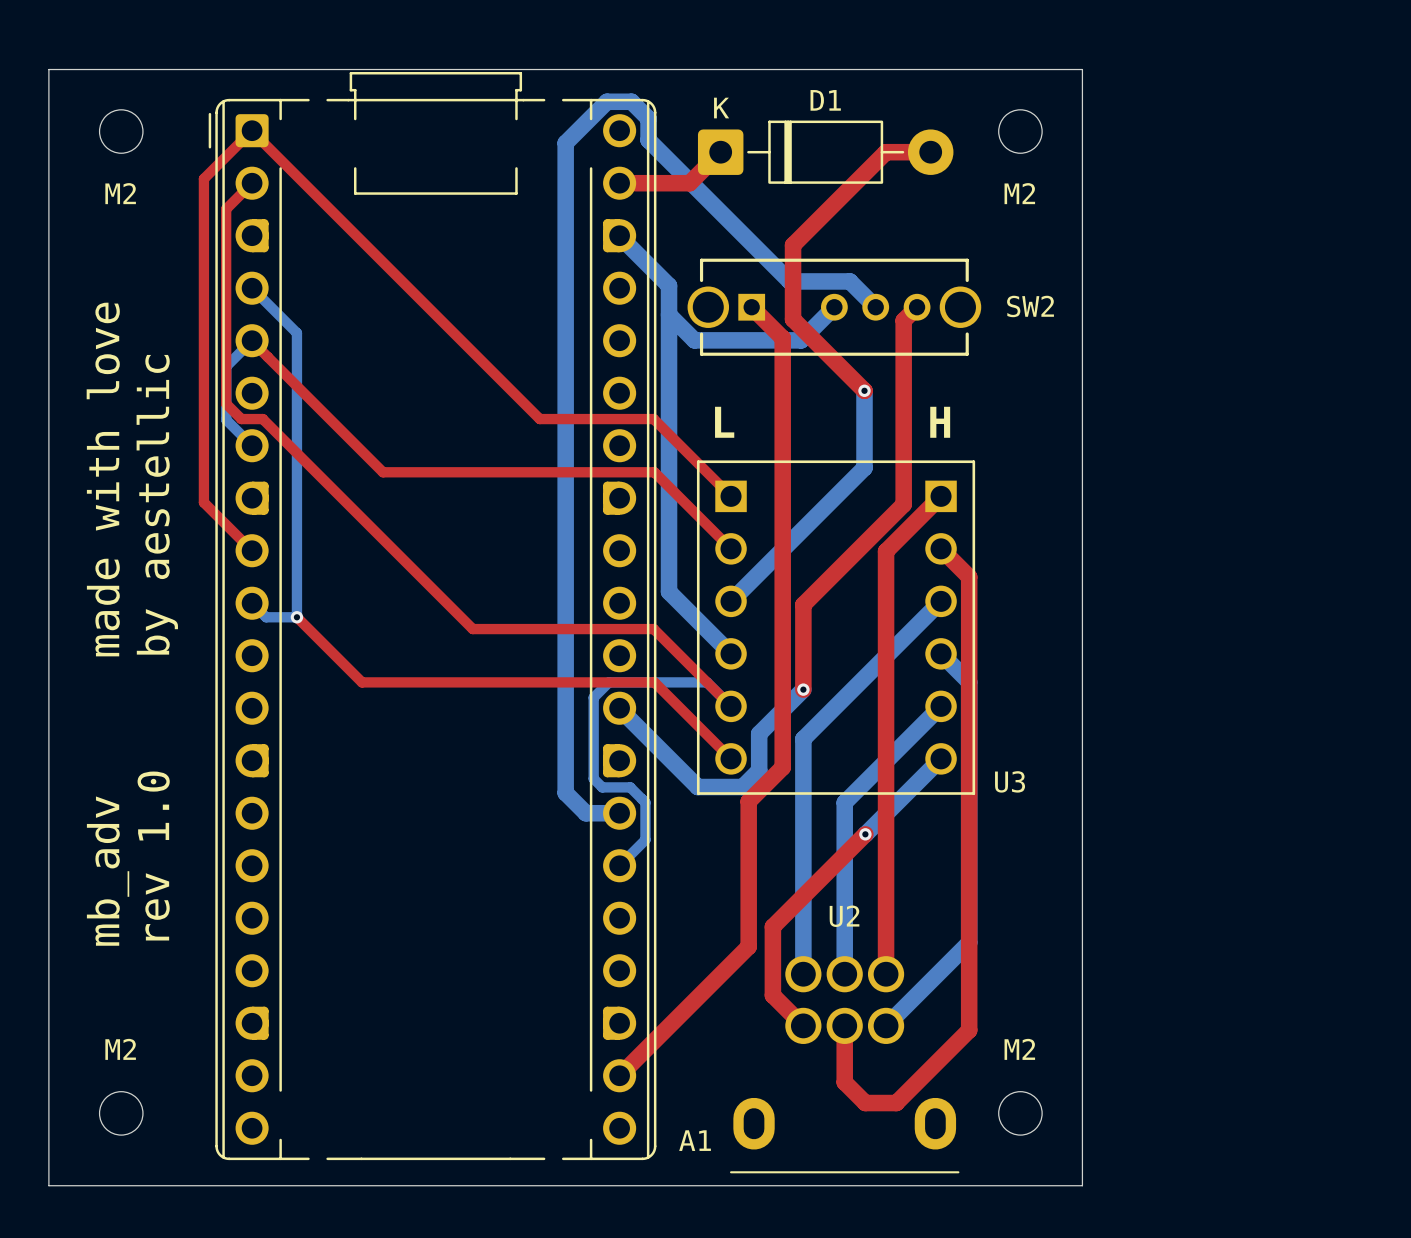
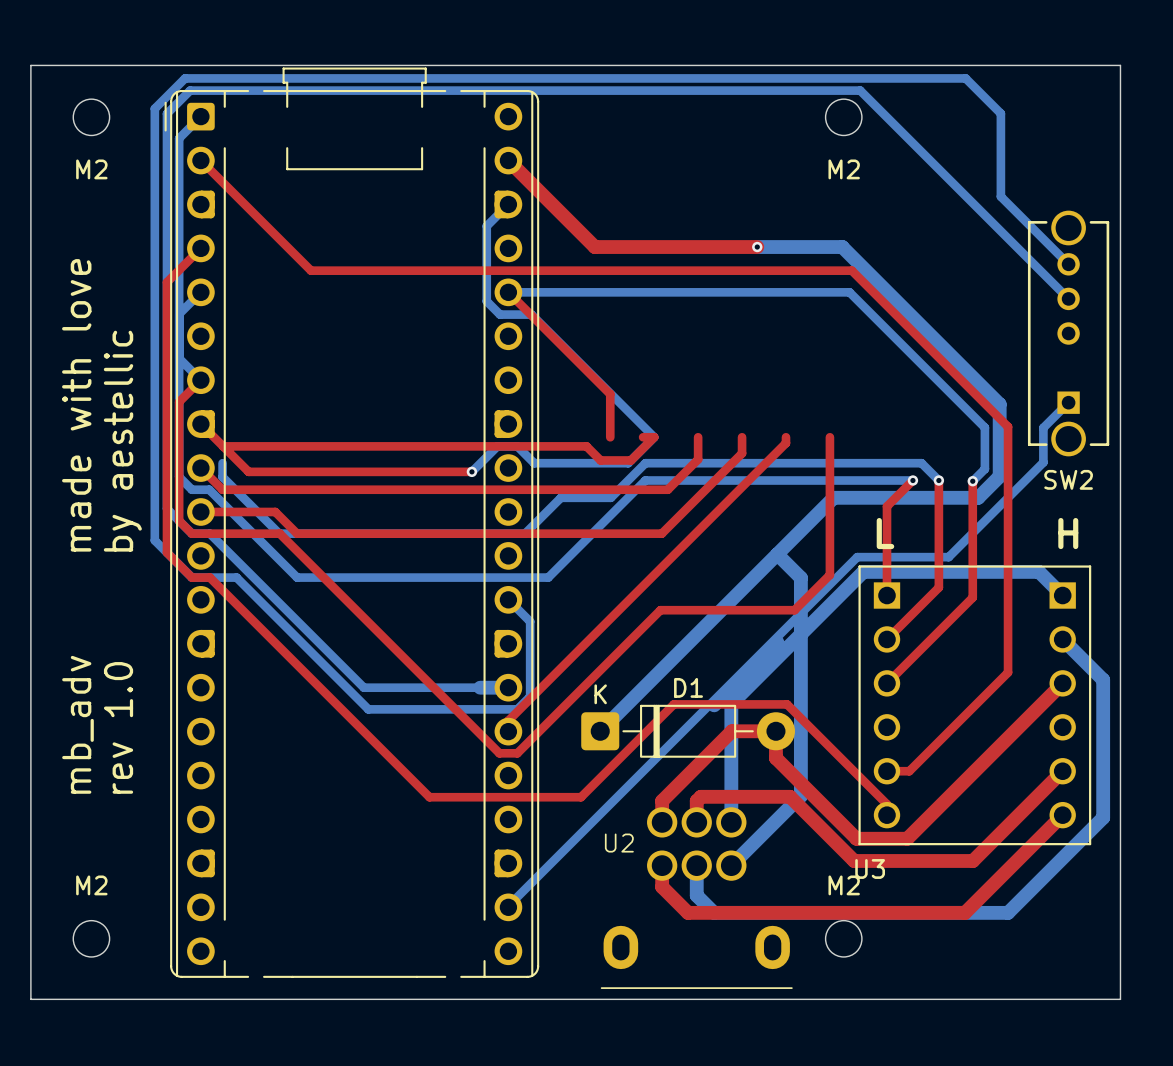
board edge: (1082, 69) (1082, 1185) -> (895, 65) (1120, 65) (1120, 999) (895, 999)
top track: (251, 130) (539, 419) (653, 419) (731, 496) -> none
bottom track: none -> (200, 116) (179, 138) (179, 476) (191, 489) (209, 489) (297, 577) (548, 577) (645, 480) (912, 480)
top track: (252, 130) (203, 178) (203, 502) (252, 550) -> (698, 437) (698, 459) (667, 489) (222, 489) (200, 468)
top track: (720, 152) (689, 183) (635, 183) -> none
D1 position: (825, 152) -> (688, 731)
top track: (930, 152) (886, 152) (793, 245) (793, 319) (864, 390) -> none
top track: (252, 183) (226, 209) (226, 403) (241, 419) (262, 419) (472, 629) -> (200, 511) (275, 511) (296, 533) (385, 533)
top track: none -> (200, 160) (311, 270) (851, 270) (1008, 426) (1008, 672) (909, 771) (886, 771)
top track: none -> (508, 160) (594, 247) (757, 247)
bottom track: (618, 235) (669, 285) (669, 591) (731, 653) (725, 653) -> (508, 204) (486, 226) (486, 301) (500, 314) (531, 314) (654, 437) (628, 463) (534, 463) (517, 446) (497, 446) (471, 471)
bottom track: none -> (757, 247) (842, 247) (999, 404) (999, 476) (978, 497) (833, 497) (600, 731)
bottom track: (252, 288) (296, 333) (296, 617) (266, 617) (252, 603) -> none
top track: none -> (200, 248) (166, 282) (166, 552) (191, 577) (209, 577) (429, 797) (581, 797) (673, 704) (787, 704) (886, 804) (886, 815)
SW2 name position: SW2 (1030, 306) -> SW2 (1068, 479)
top track: (751, 307) (782, 338) (782, 767) (748, 801) (748, 946) (619, 1075) -> none
bottom track: (834, 307) (801, 340) (694, 340) (669, 314) -> none
SW2 rotation: 0° (834, 307) -> 90° counterclockwise (1068, 333)
SW2 position: (834, 307) -> (1068, 333)
bottom track: (875, 307) (849, 281) (789, 281) (648, 140) (648, 118) (631, 101) (607, 101) (565, 143) (565, 792) (585, 813) -> (1068, 298) (860, 90) (190, 90) (166, 113) (166, 508) (191, 533) (209, 533) (363, 687) (480, 687)
top track: (917, 307) (903, 320) (903, 504) (803, 604) (803, 689) -> none
top track: (251, 340) (383, 472) (654, 472) (731, 548) -> none
bottom track: none -> (508, 292) (849, 292) (984, 427) (984, 469) (972, 481)
top track: none -> (508, 292) (610, 394) (610, 437)
bottom track: (864, 390) (864, 467) (731, 601) -> none
via position: (864, 390) -> (757, 247)
text position: L (724, 422) -> L (885, 533)
text position: H (940, 422) -> H (1068, 533)
top track: none -> (200, 380) (179, 401) (179, 520) (191, 533) (279, 533) (499, 753) (517, 753) (660, 610) (794, 610) (829, 574) (829, 437)
bottom track: none -> (1068, 402) (1043, 427) (1043, 462) (948, 557) (857, 557) (508, 907)
top track: (941, 496) (886, 551) (886, 974) -> none
top track: none -> (200, 424) (248, 471) (471, 471)
top track: none -> (643, 437) (654, 437) (630, 460) (600, 460) (586, 446) (223, 446)
top track: none -> (785, 437) (785, 443) (508, 720) (508, 731)
bottom track: none -> (222, 463) (222, 477) (279, 533) (525, 533) (560, 497) (610, 497) (645, 463) (921, 463) (938, 480)
top track: (941, 548) (969, 577) (969, 1030) (896, 1103) (865, 1103) (844, 1082) (844, 1025) -> none
via: none -> (471, 471)
top track: none -> (912, 480) (886, 506) (886, 595)
via: none -> (912, 480)
top track: none -> (938, 480) (938, 587) (886, 639)
via: none -> (938, 480)
top track: none -> (972, 481) (972, 597) (886, 683)
via: none -> (972, 481)
bottom track: (941, 601) (803, 739) (803, 974) -> none
top track: (296, 617) (362, 682) (654, 682) (731, 758) (731, 750) -> none
via: (296, 617) -> none
U3 position: (836, 627) -> (974, 705)
top track: (653, 629) (731, 706) (731, 698) -> (536, 533) (661, 533) (742, 453) (742, 437)
bottom track: (803, 689) (759, 733) (759, 770) (742, 787) (697, 787) (618, 708) -> (1068, 264) (1000, 196) (1000, 113) (965, 78) (185, 78) (154, 108) (154, 540) (191, 577) (236, 577) (368, 709) (517, 709) (530, 696) (530, 621) (508, 599)
via: (803, 689) -> none
bottom track: none -> (1062, 595) (1039, 571) (863, 571) (731, 703) (731, 822)
bottom track: (731, 706) (707, 682) (608, 682) (593, 697) (593, 778) (602, 787) (630, 787) (645, 802) (645, 839) (619, 865) -> none
bottom track: (941, 706) (844, 802) (844, 974) -> none
bottom track: none -> (1062, 639) (1103, 679) (1103, 817) (1008, 912) (714, 912) (696, 895) (696, 865)
U3 name position: U3 (1010, 781) -> U3 (870, 868)
top track: none -> (1062, 683) (907, 838) (856, 838) (775, 758) (775, 731) (731, 731) (662, 800) (662, 822)
top track: (865, 834) (772, 926) (772, 995) (803, 1025) -> (1062, 815) (964, 912) (688, 912) (662, 887) (662, 865)
via: (865, 834) -> none
top track: none -> (1062, 771) (972, 860) (854, 860) (790, 796) (700, 796) (696, 800) (696, 822)
U2 name position: U2 (844, 916) -> U2 (619, 843)
A1 name: A1 (695, 1140) -> none

